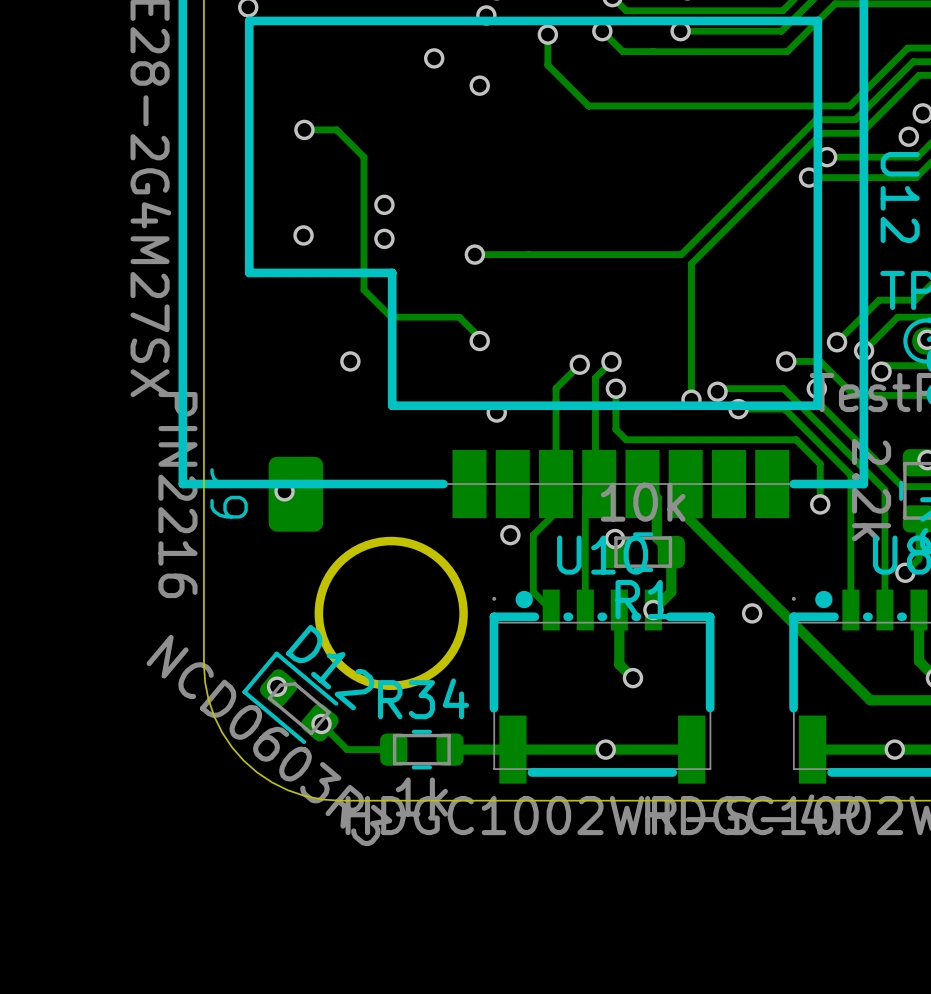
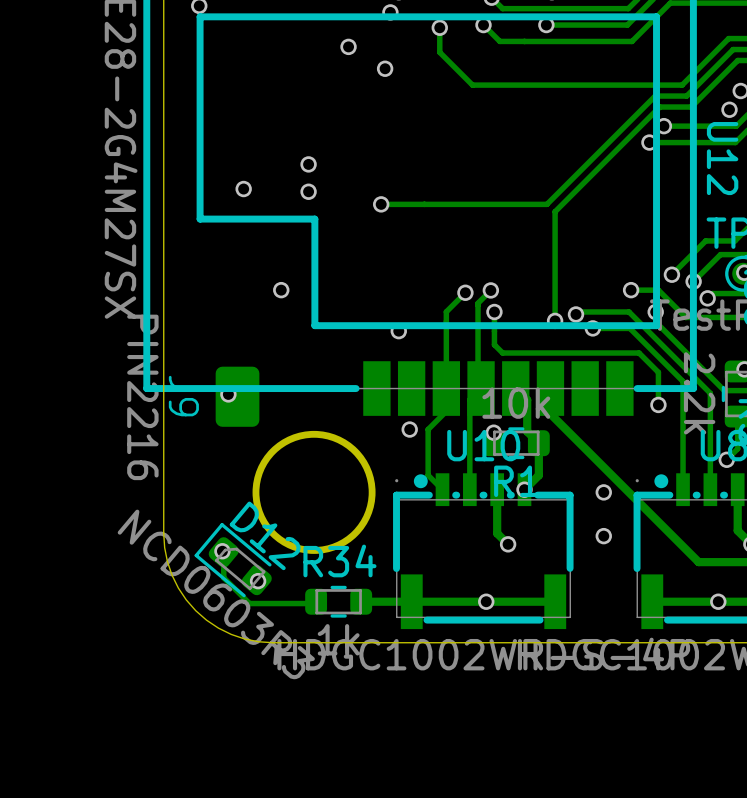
track: (304, 129) (336, 129) (363, 157) (363, 289) (391, 317) (459, 317) (479, 337) (479, 341) -> none
via: (304, 129) -> none
via: (479, 341) -> none
via: none -> (603, 536)
track: (321, 723) (347, 749) (393, 749) -> (223, 552) (223, 577) (249, 603) (314, 603) (316, 601)

